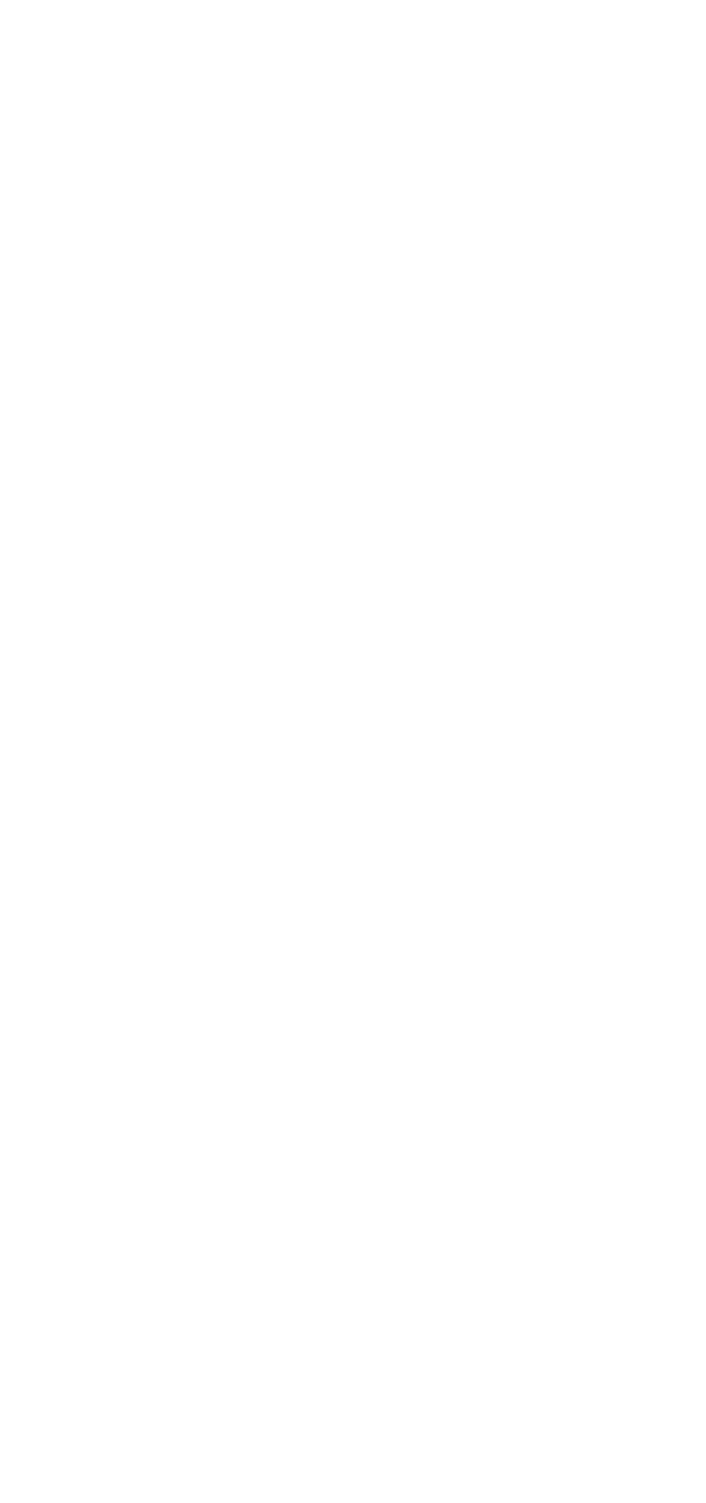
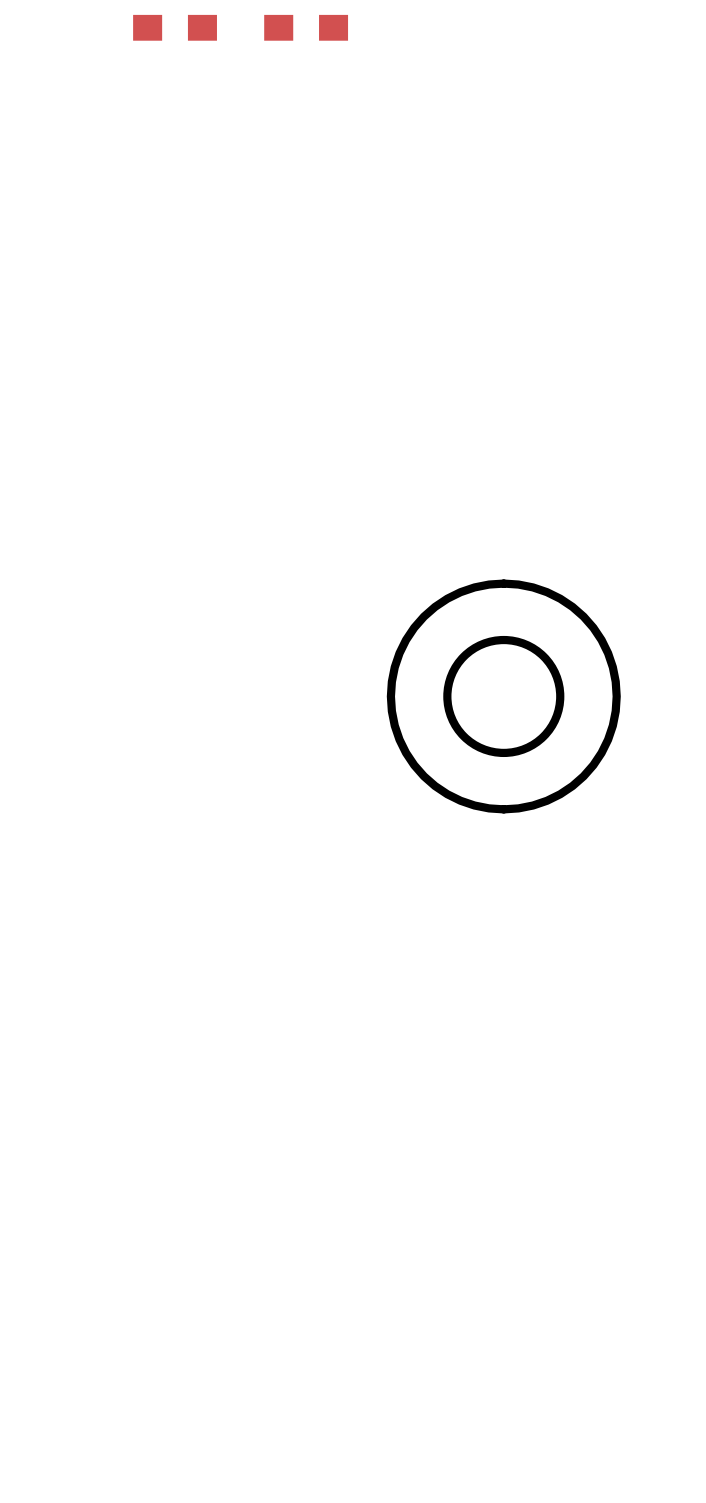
part: none -> (175, 27)
part: none -> (306, 27)
board edge: none -> (503, 583) (533, 587) (547, 592) (572, 606) (583, 616) (593, 627) (608, 653) (612, 667) (616, 696) (612, 725) (608, 739) (593, 765) (583, 776) (572, 786) (547, 800) (533, 805) (503, 809) (474, 805) (460, 800) (435, 786) (423, 776) (406, 752) (399, 739) (394, 725) (390, 696) (394, 667) (399, 653) (406, 640) (423, 616) (435, 606) (460, 592) (474, 587) (503, 583)
round board edge: none -> [443, 635, 565, 758]

